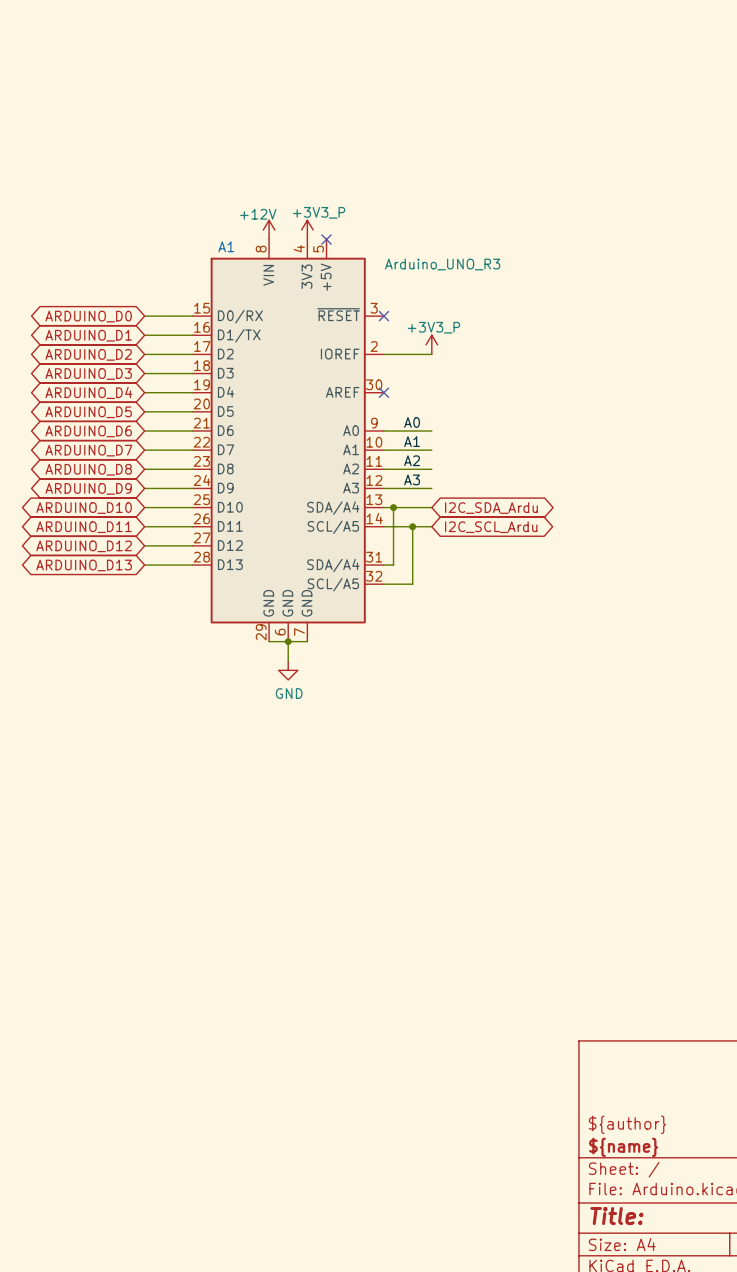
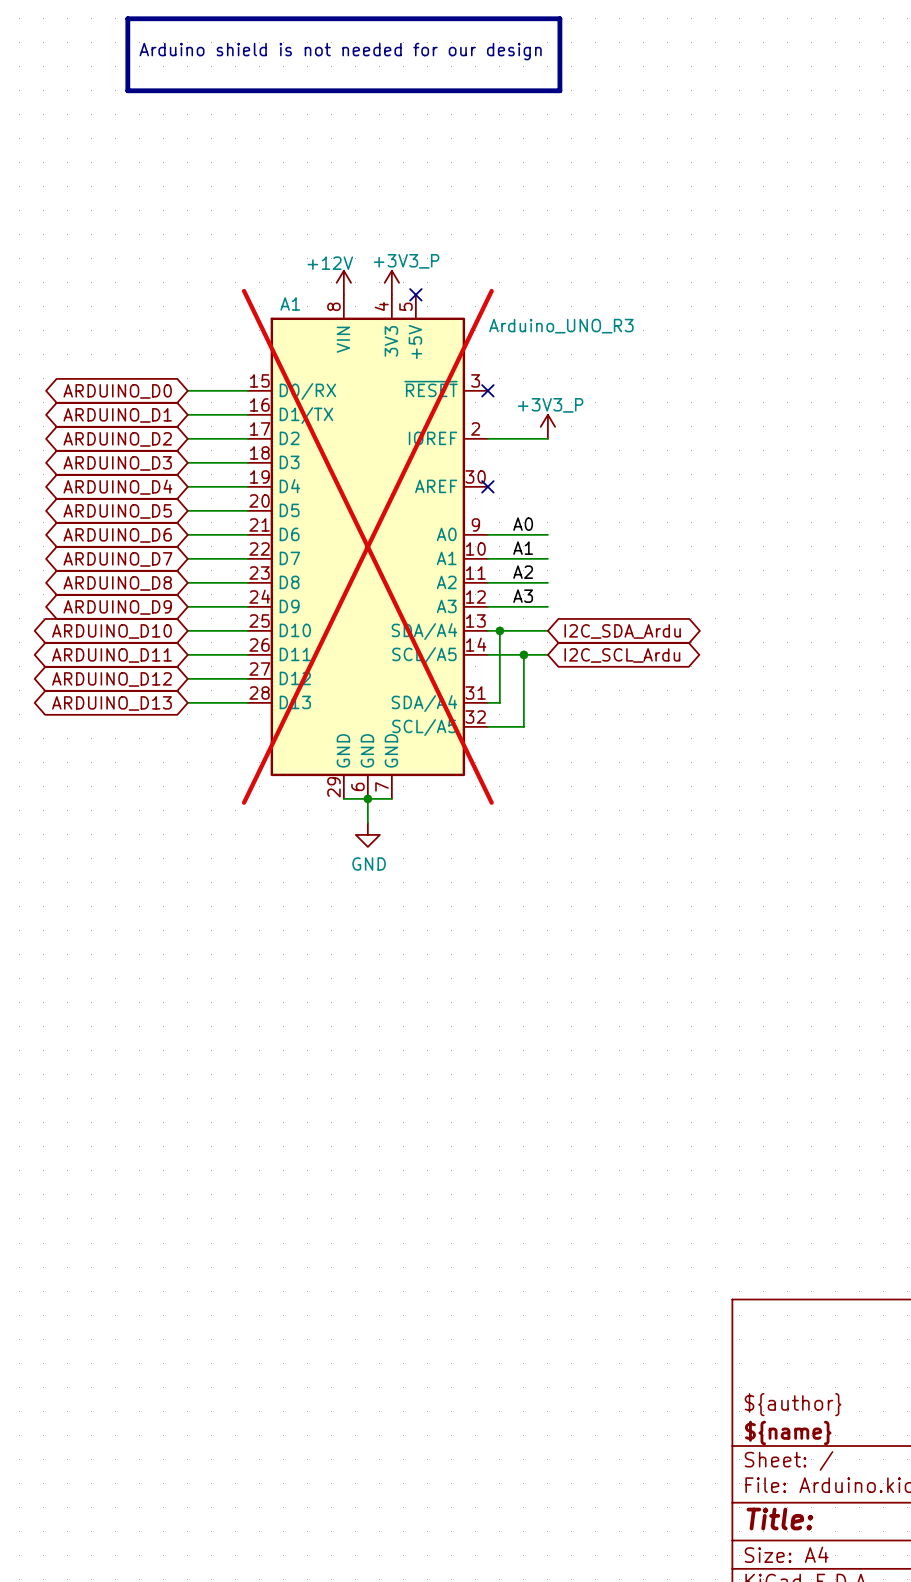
line: none -> (127, 18) (559, 18) (559, 90) (127, 90) (127, 18)
text: none -> Arduino shield is not needed for our design (340, 51)
A1 do-not-place cross: none -> (367, 546)

